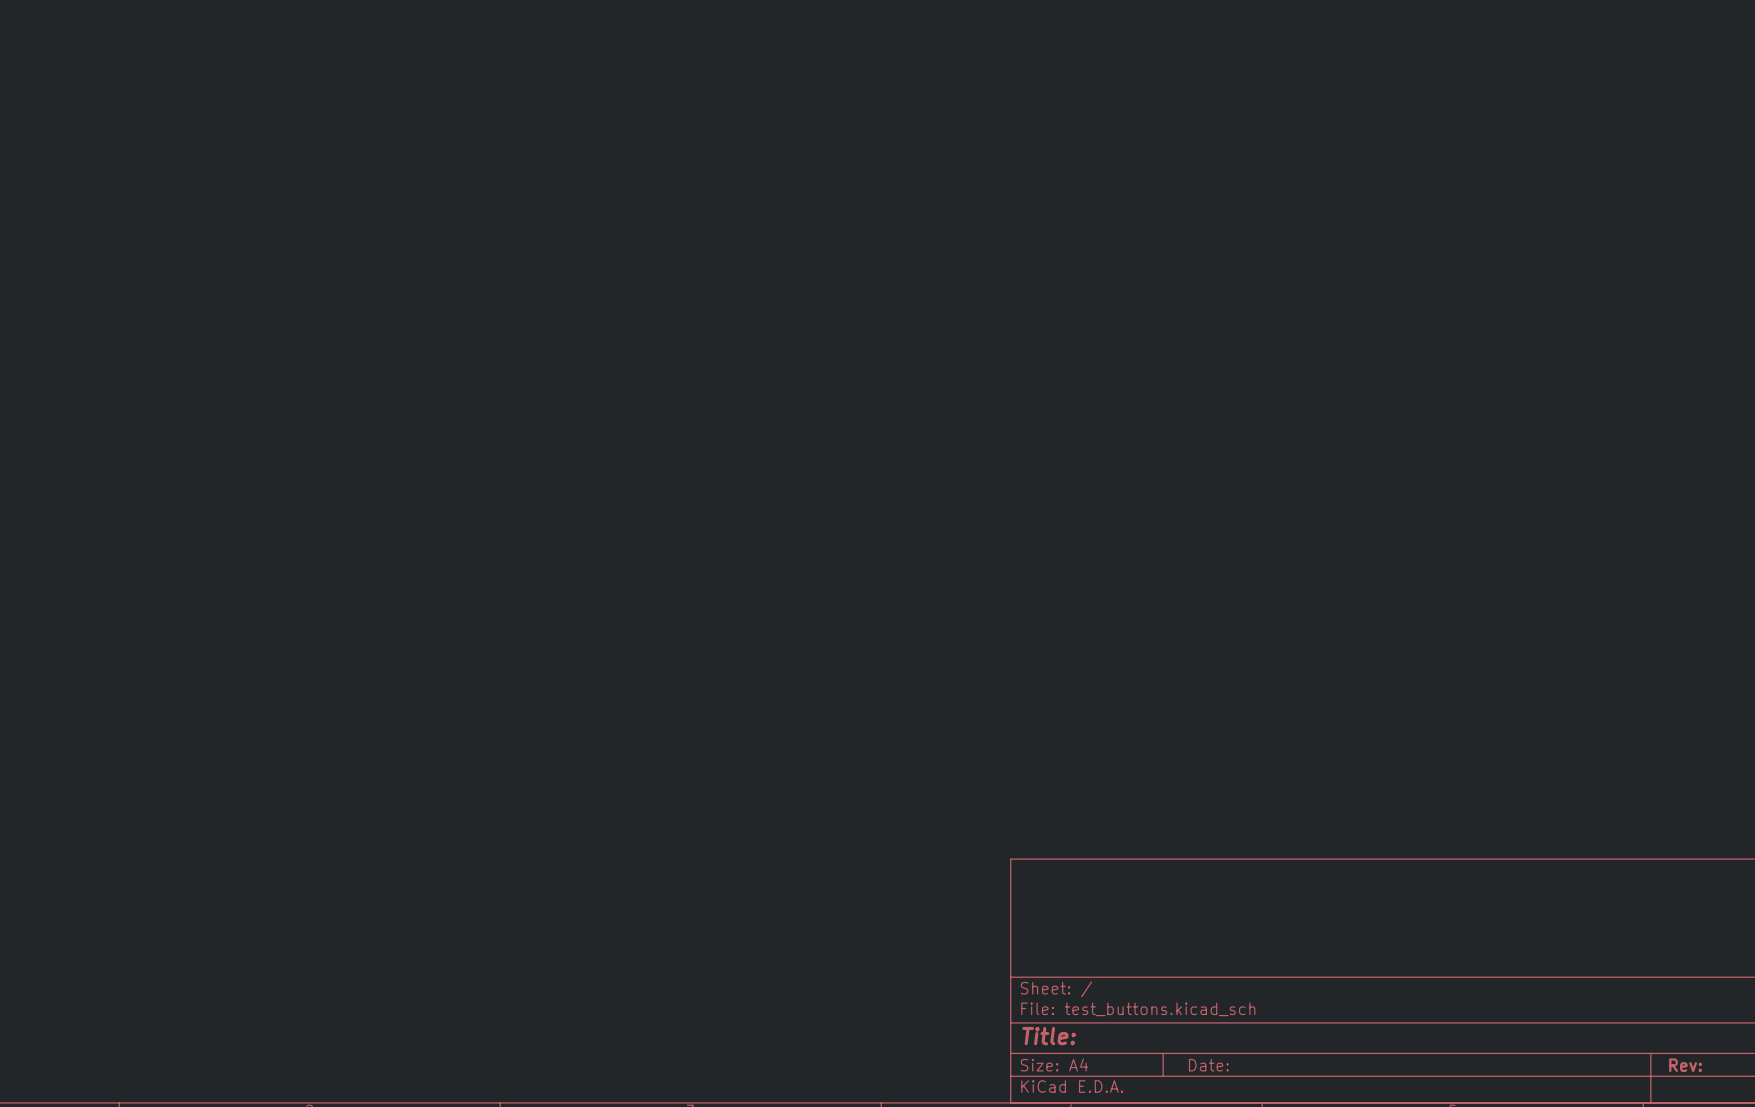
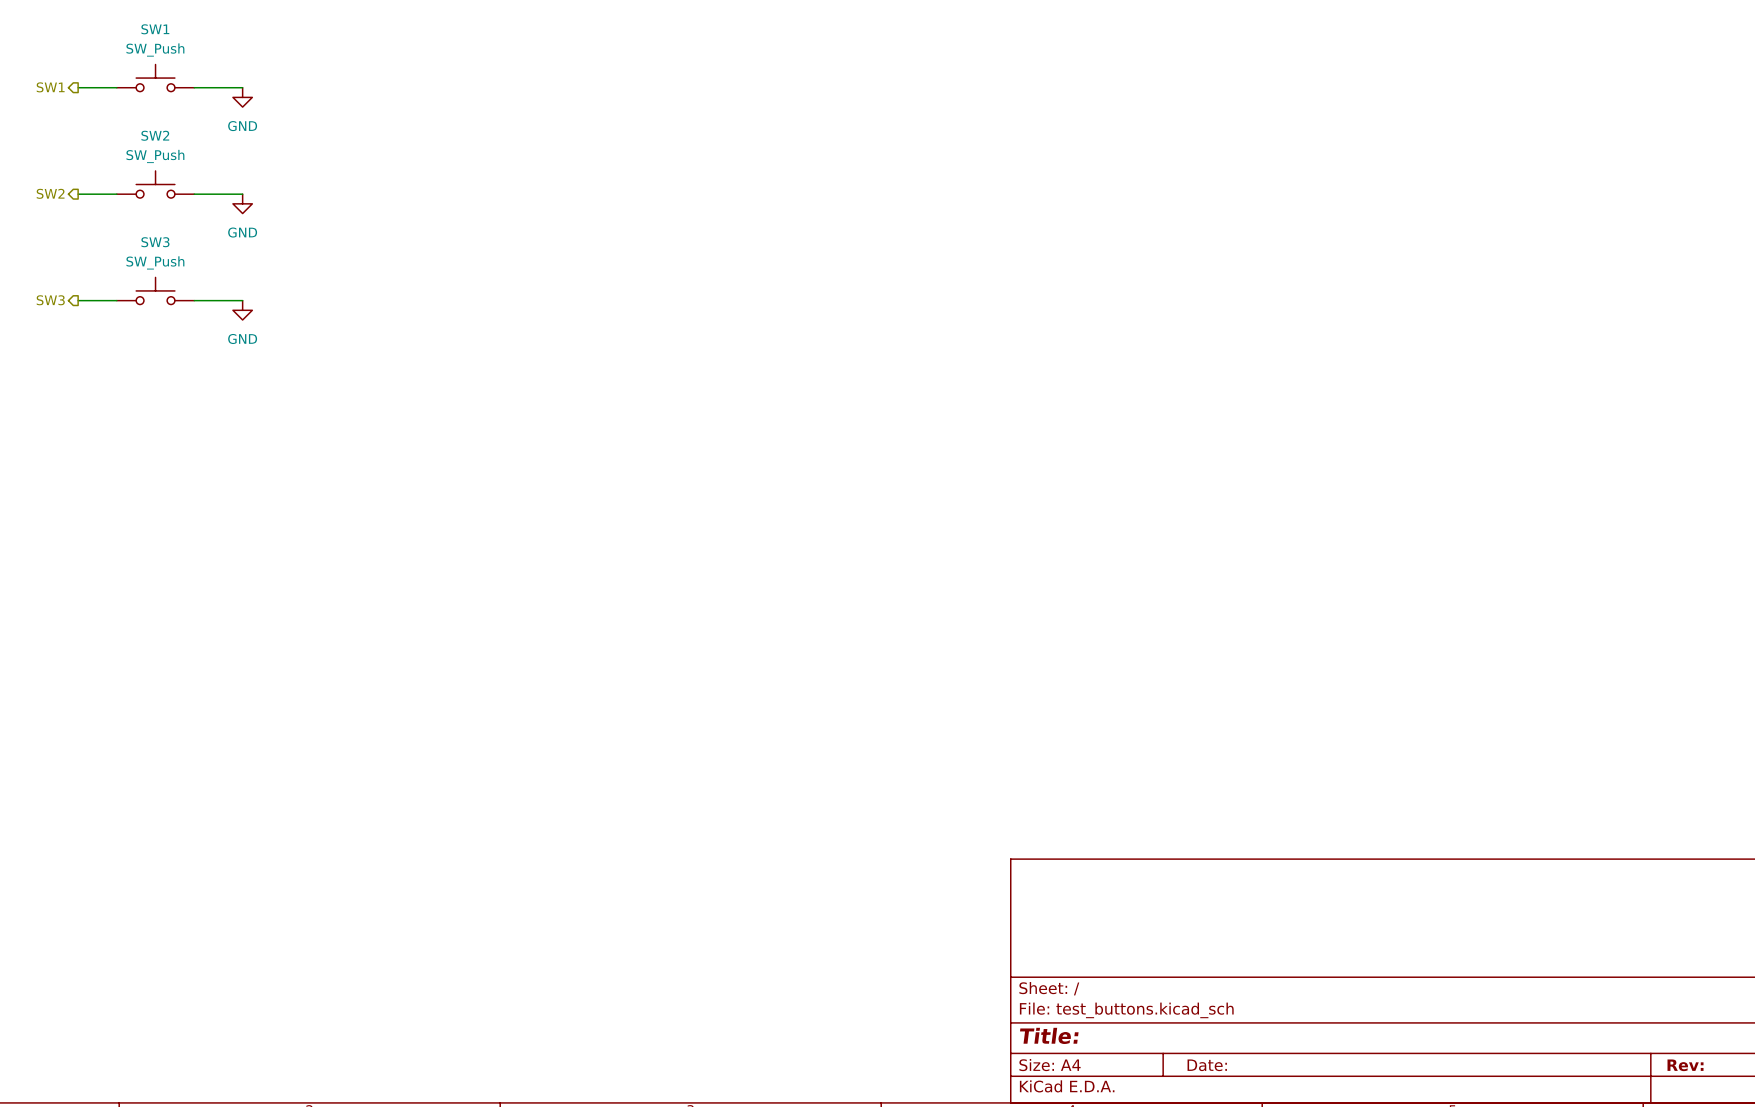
SW1: none -> SW_Push (155, 78)
hierarchical label: none -> SW1 (50, 87)
wire: none -> (78, 87) (116, 87)
wire: none -> (194, 87) (242, 87)
power symbol: none -> GND (242, 97)
SW2: none -> SW_Push (155, 184)
hierarchical label: none -> SW2 (50, 193)
wire: none -> (78, 194) (116, 194)
wire: none -> (194, 194) (242, 194)
power symbol: none -> GND (242, 203)
SW3: none -> SW_Push (155, 290)
hierarchical label: none -> SW3 (50, 300)
wire: none -> (78, 300) (116, 300)
wire: none -> (194, 300) (242, 300)
power symbol: none -> GND (242, 310)

